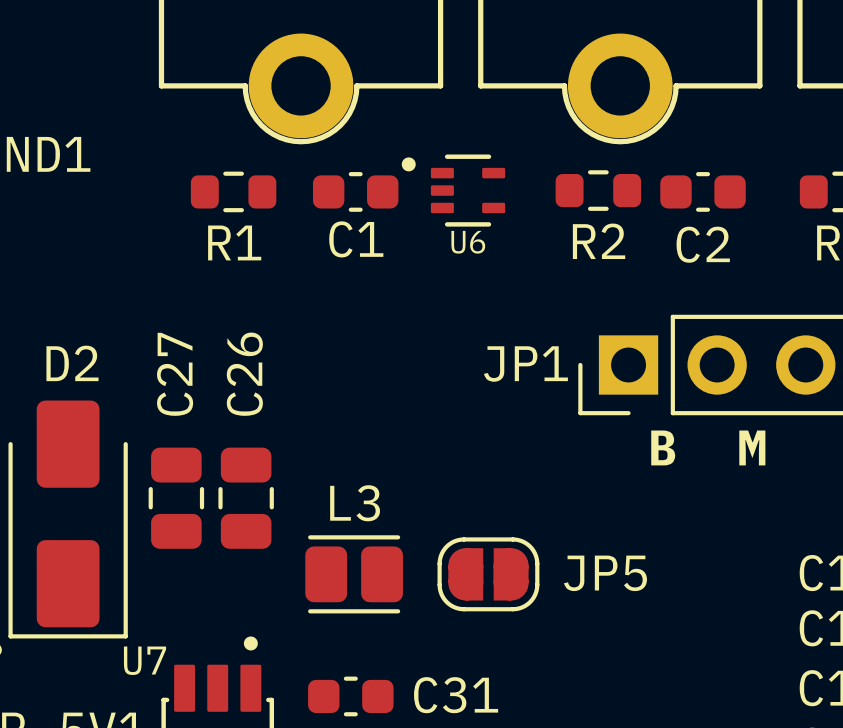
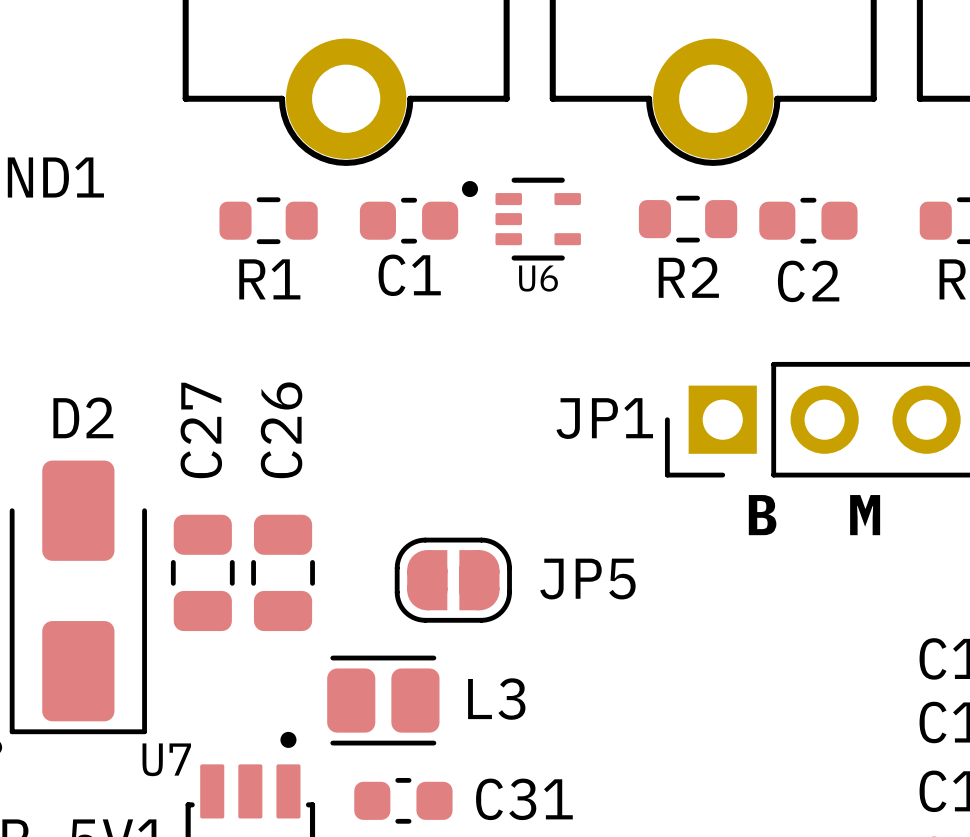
L3 name position: L3 (355, 503) -> L3 (496, 699)
L3 position: (354, 574) -> (383, 700)
JP5 position: (488, 574) -> (453, 580)

